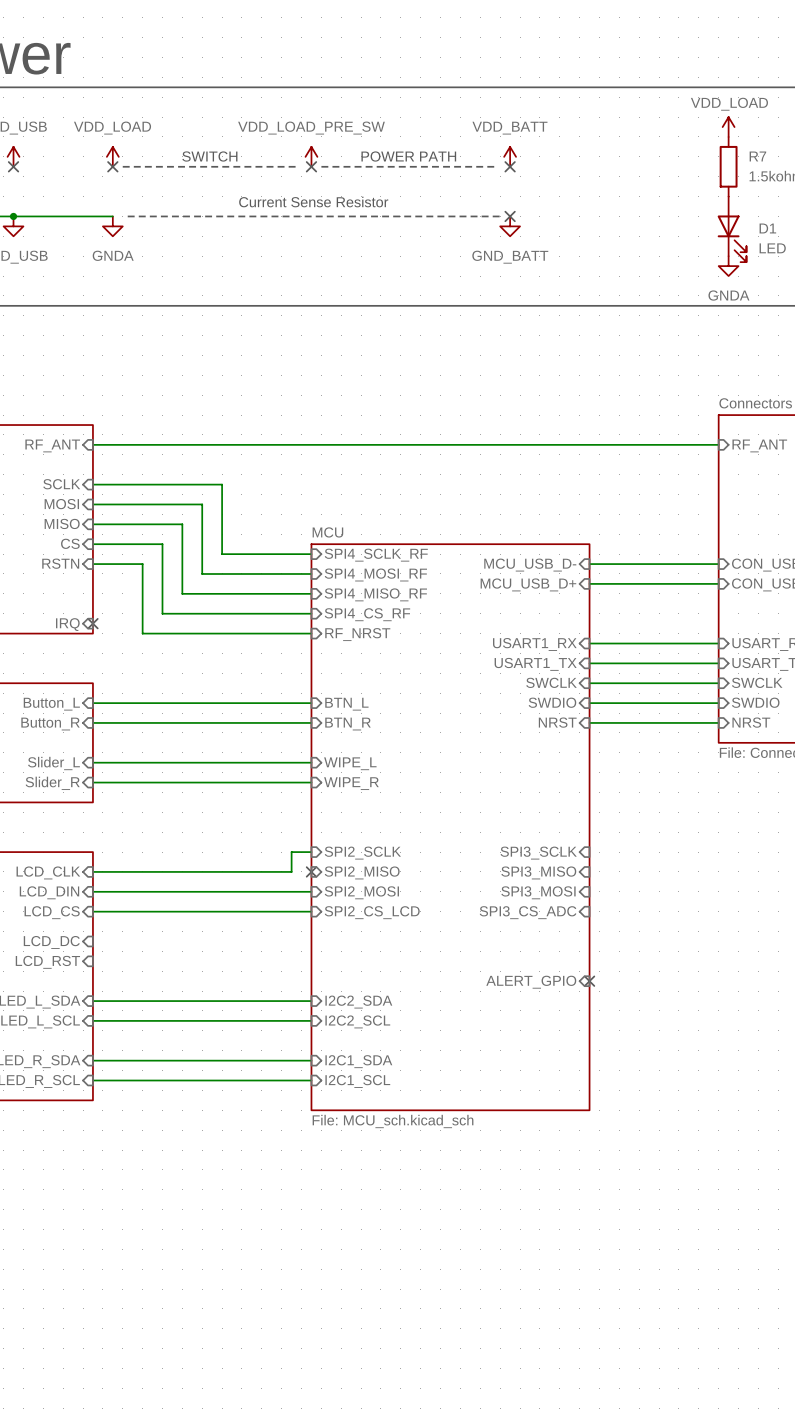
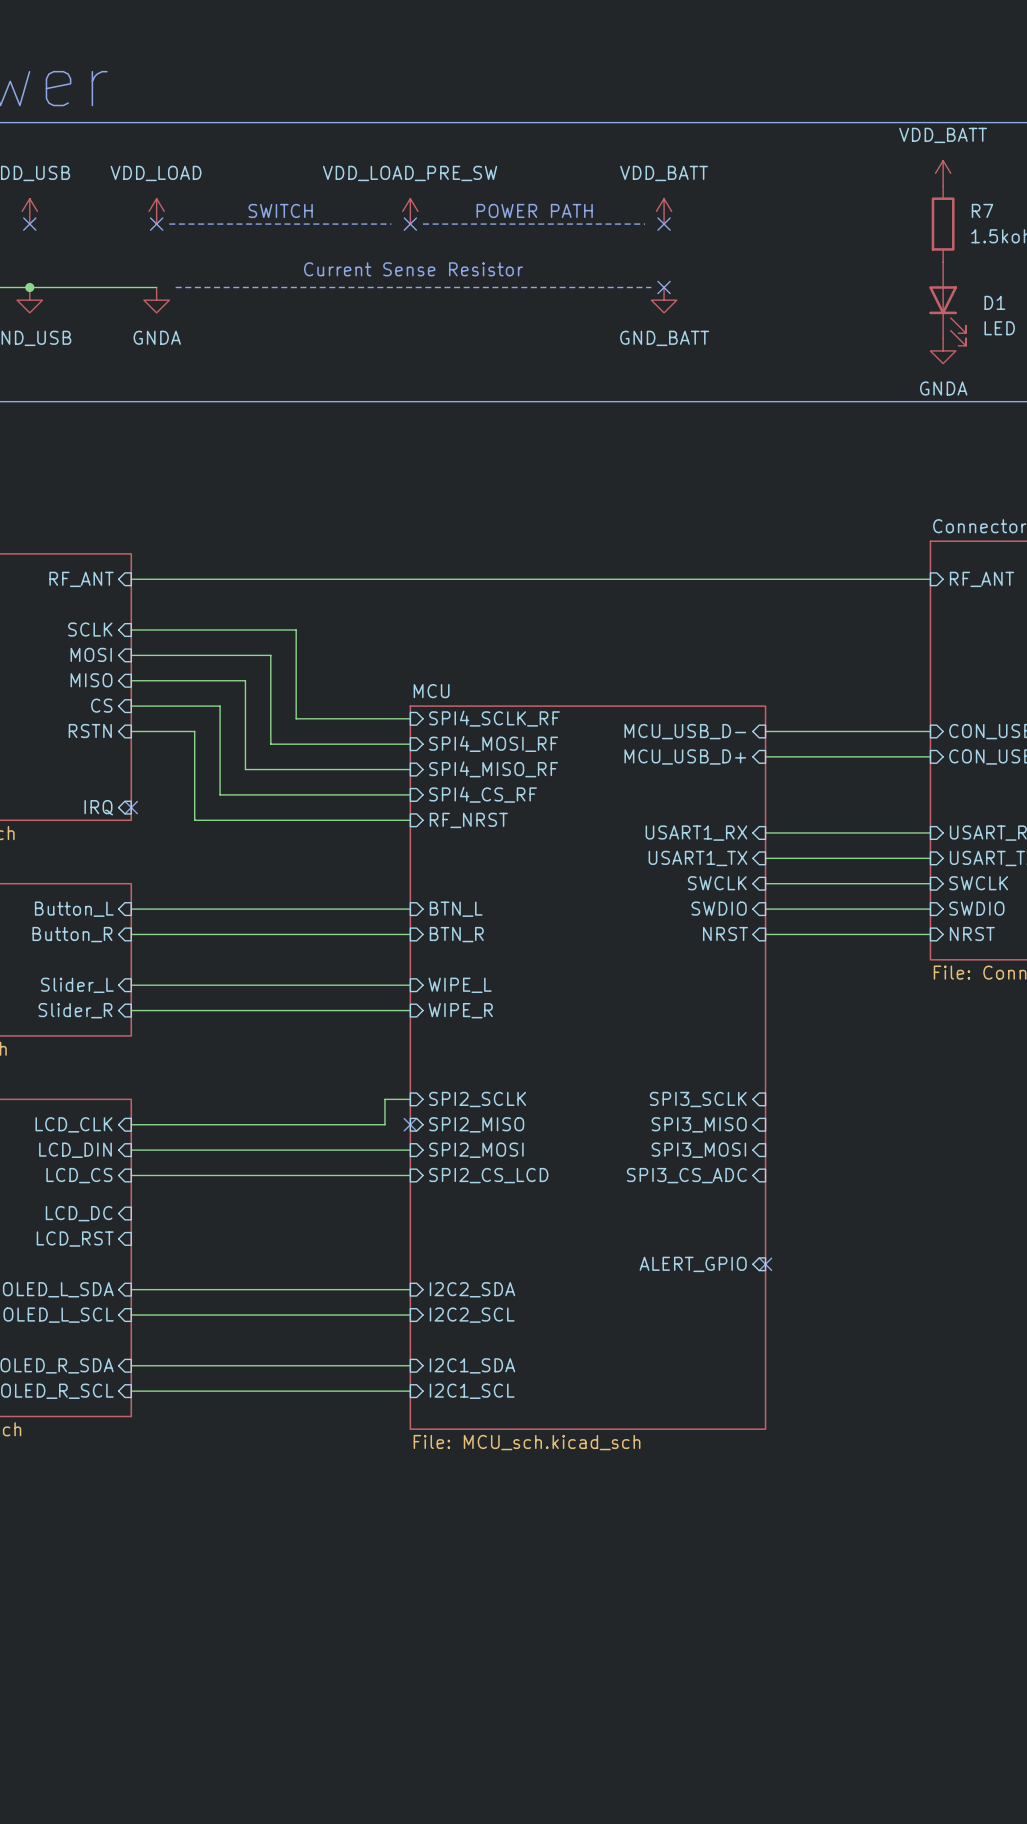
power symbol: VDD_LOAD (728, 127) -> VDD_BATT (943, 173)

